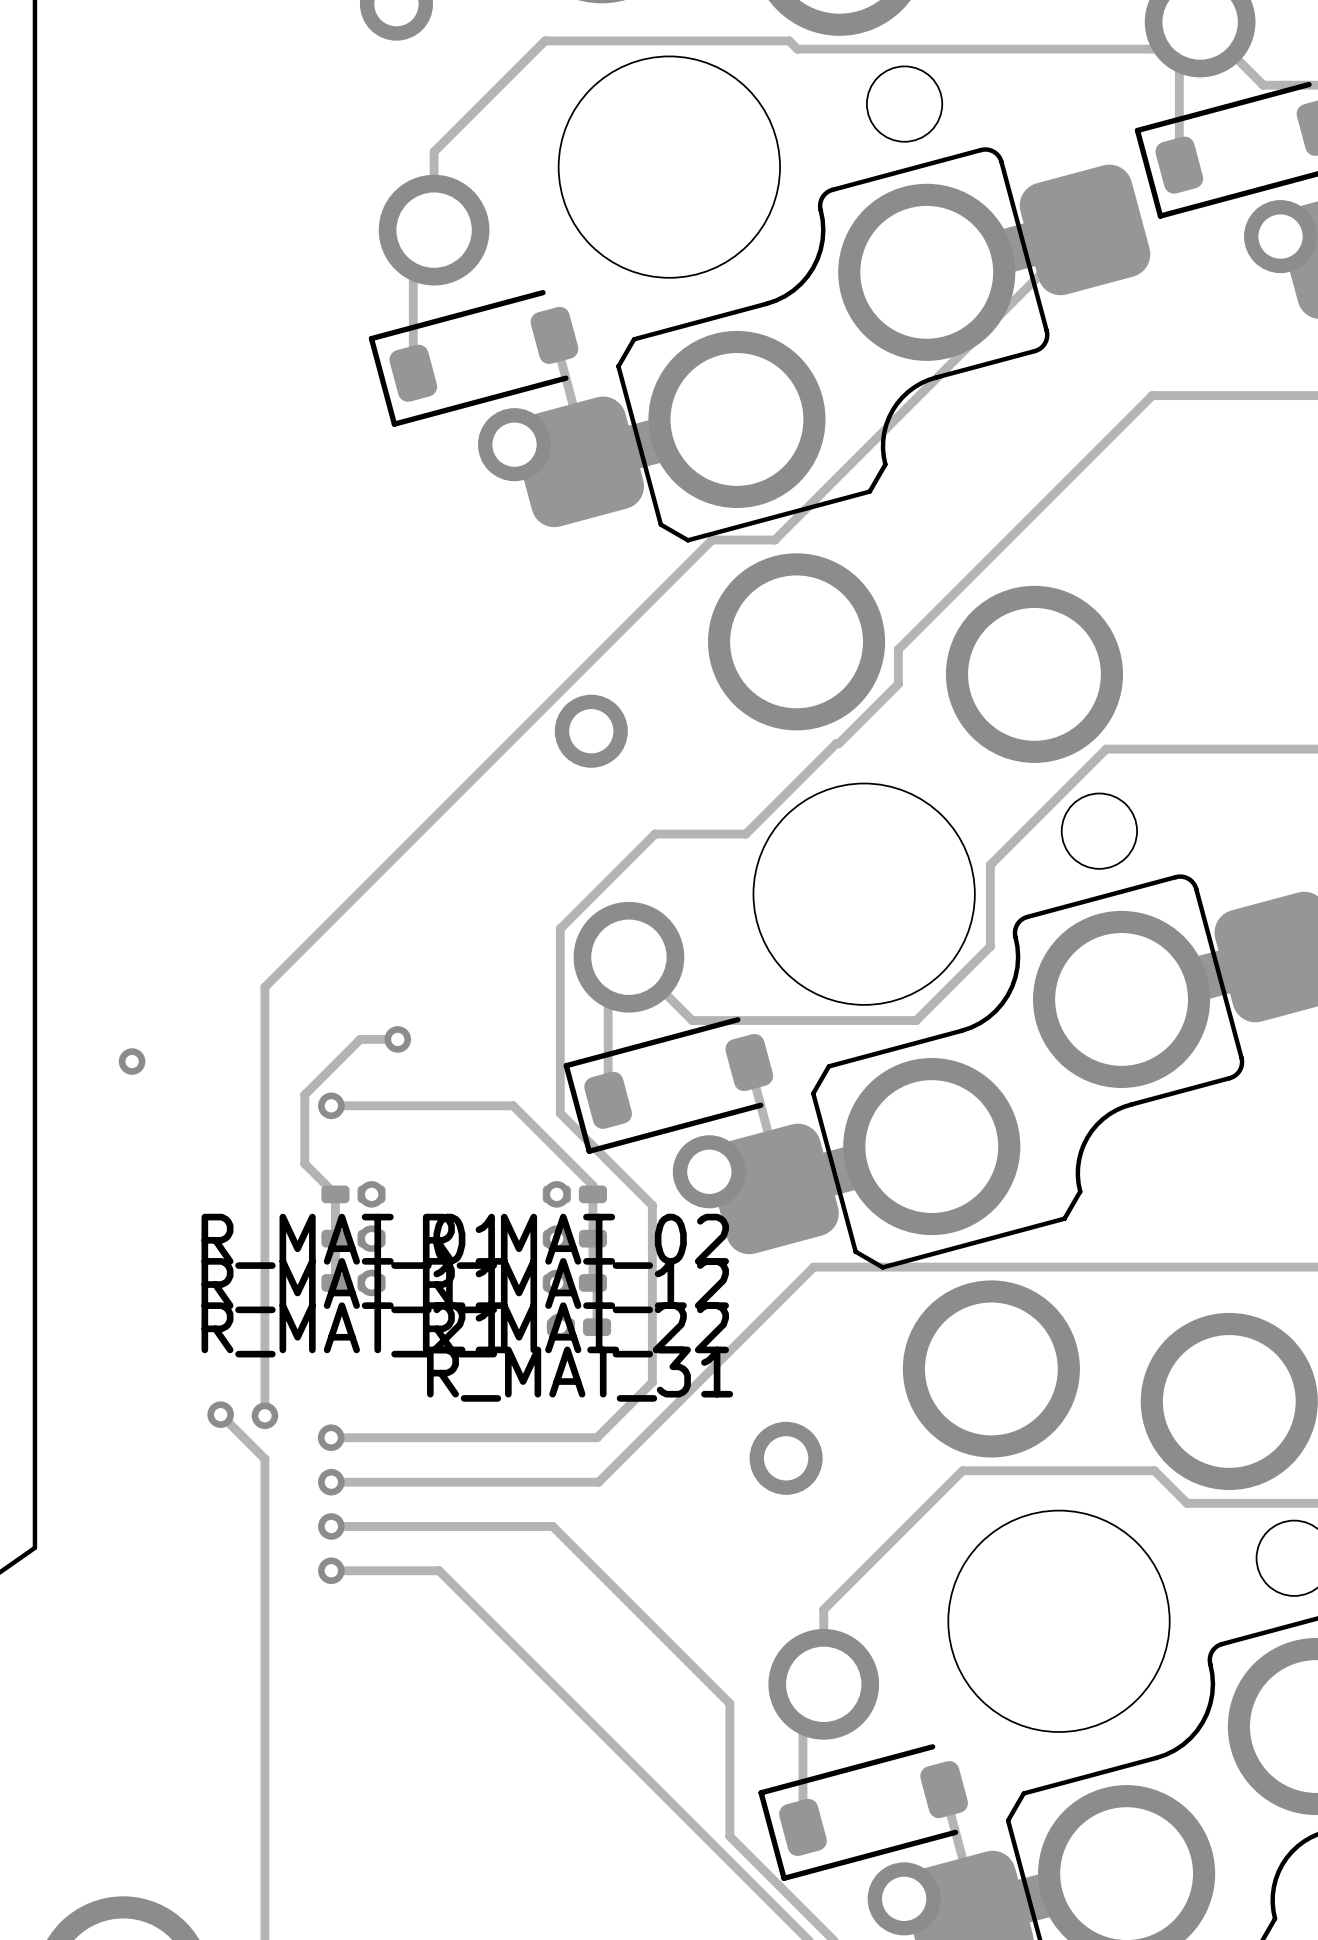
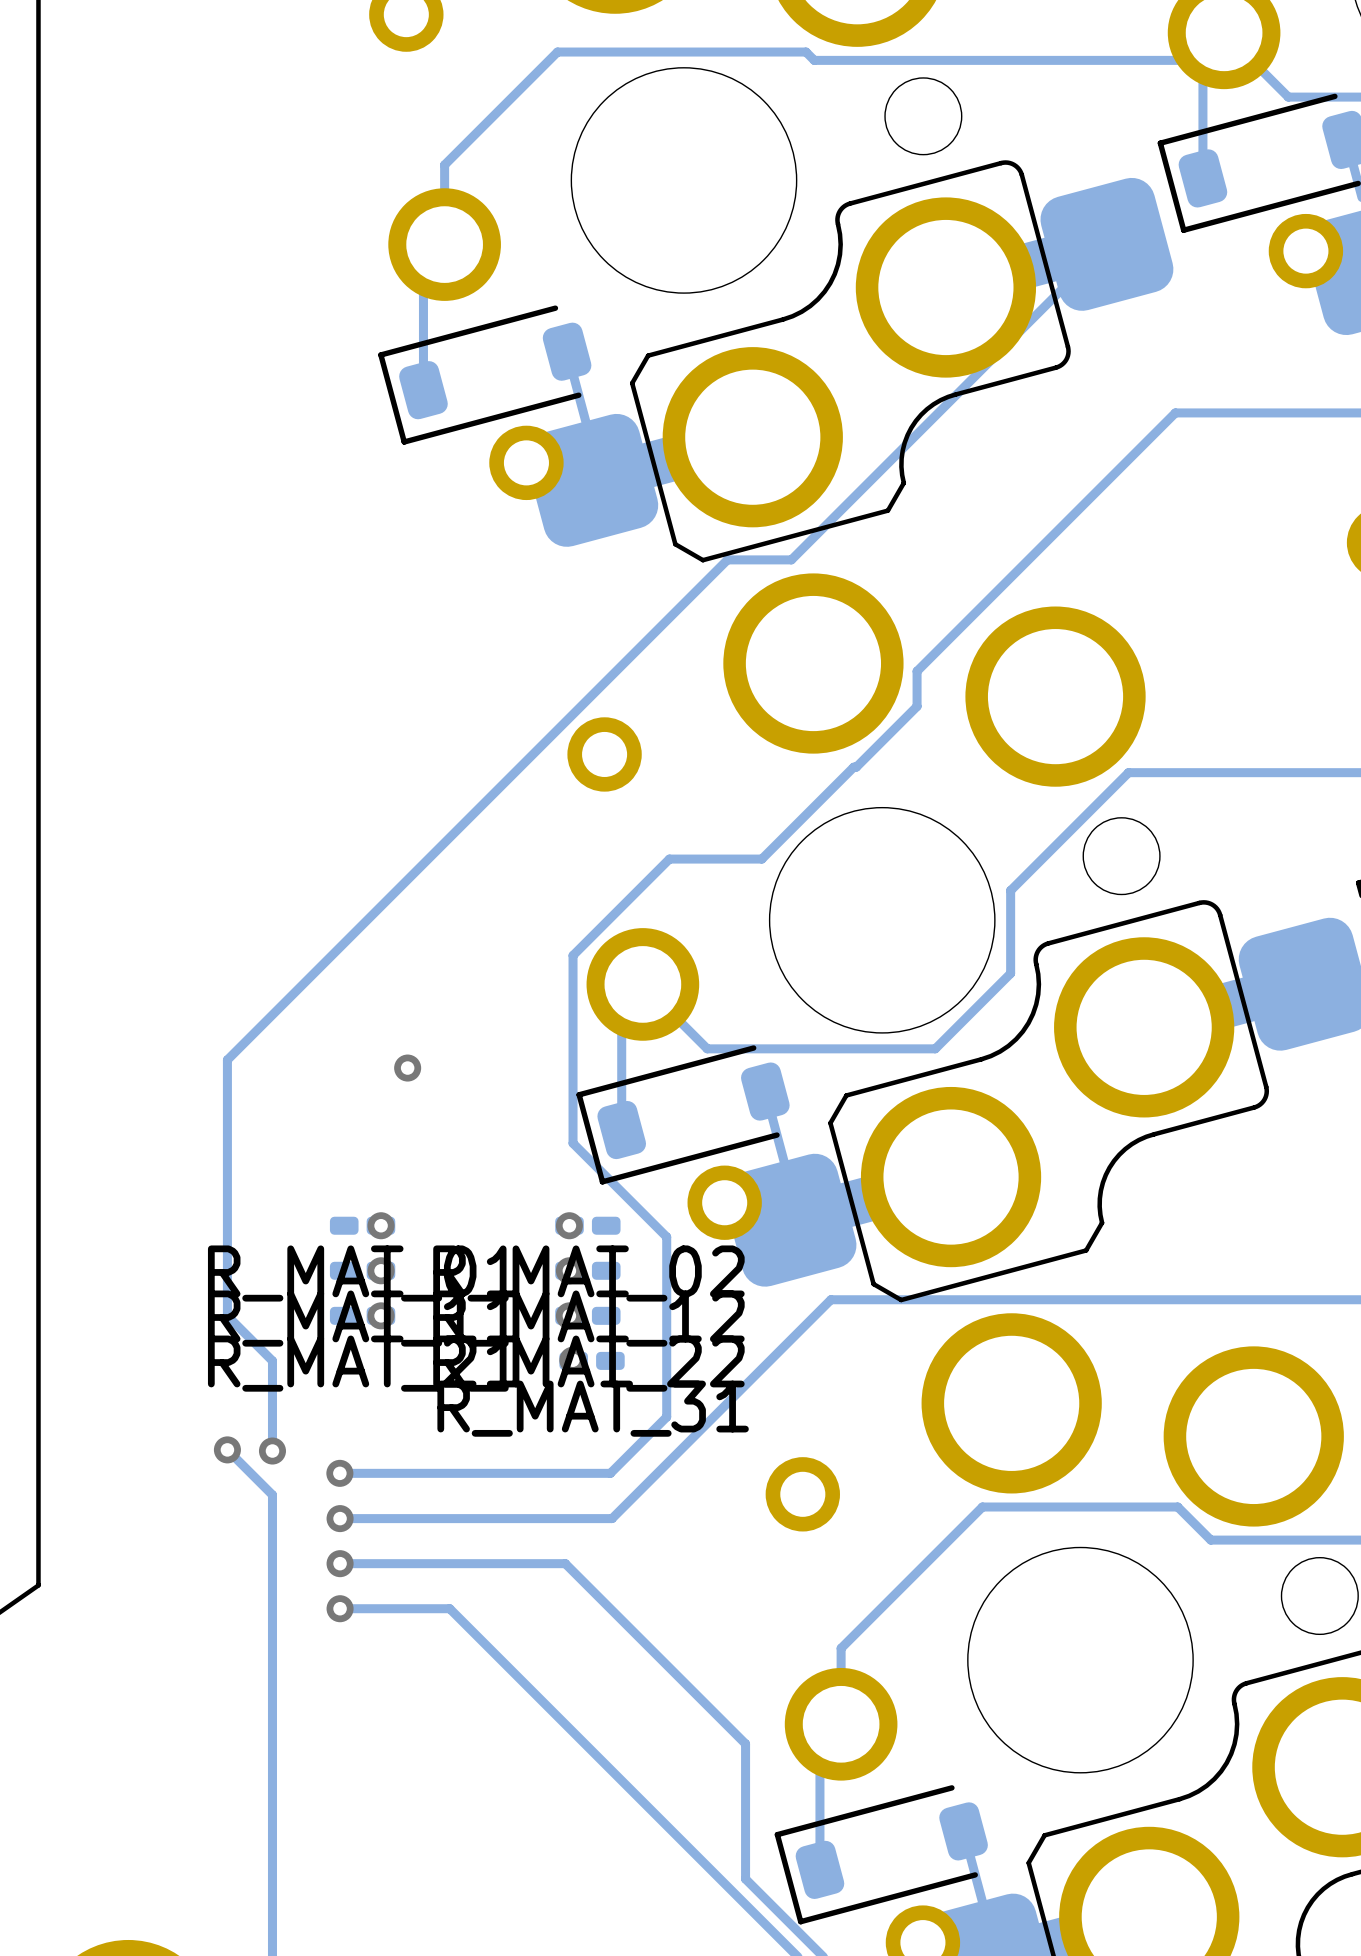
track: (264, 987) (264, 1327) -> (272, 1014) (227, 1059) (227, 1315) (272, 1360)
track: (397, 1039) (360, 1039) (304, 1094) (304, 1163) (335, 1194) (335, 1282) -> none
via: (132, 1061) -> none
track: (331, 1105) (513, 1105) (592, 1185) (592, 1282) (597, 1287) (597, 1327) -> none
via: (331, 1105) -> none

